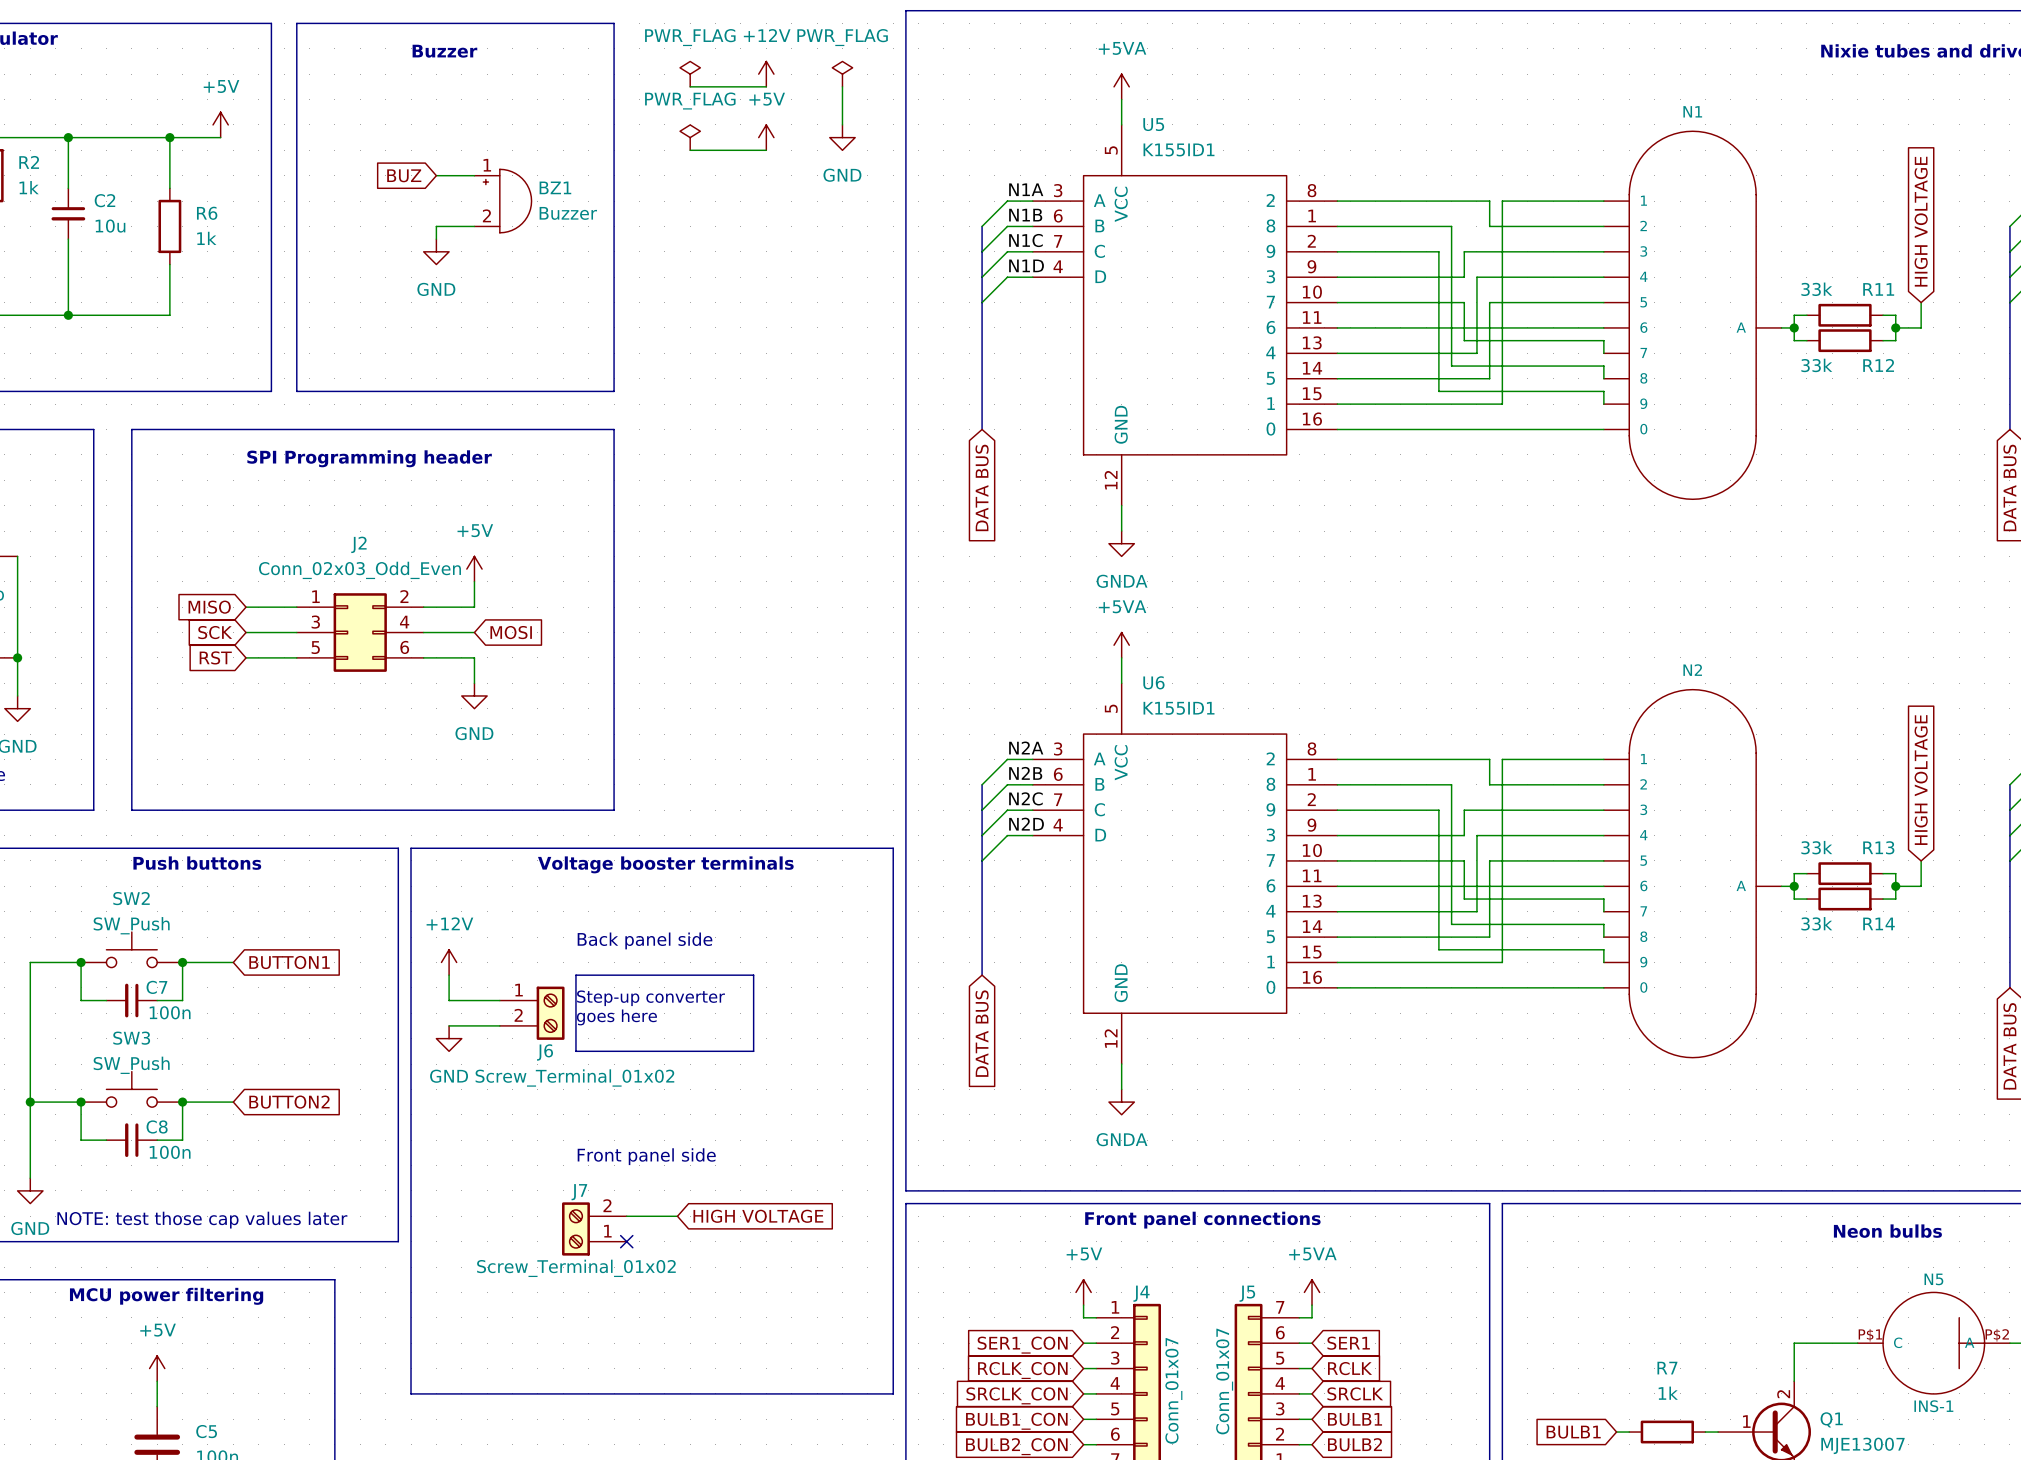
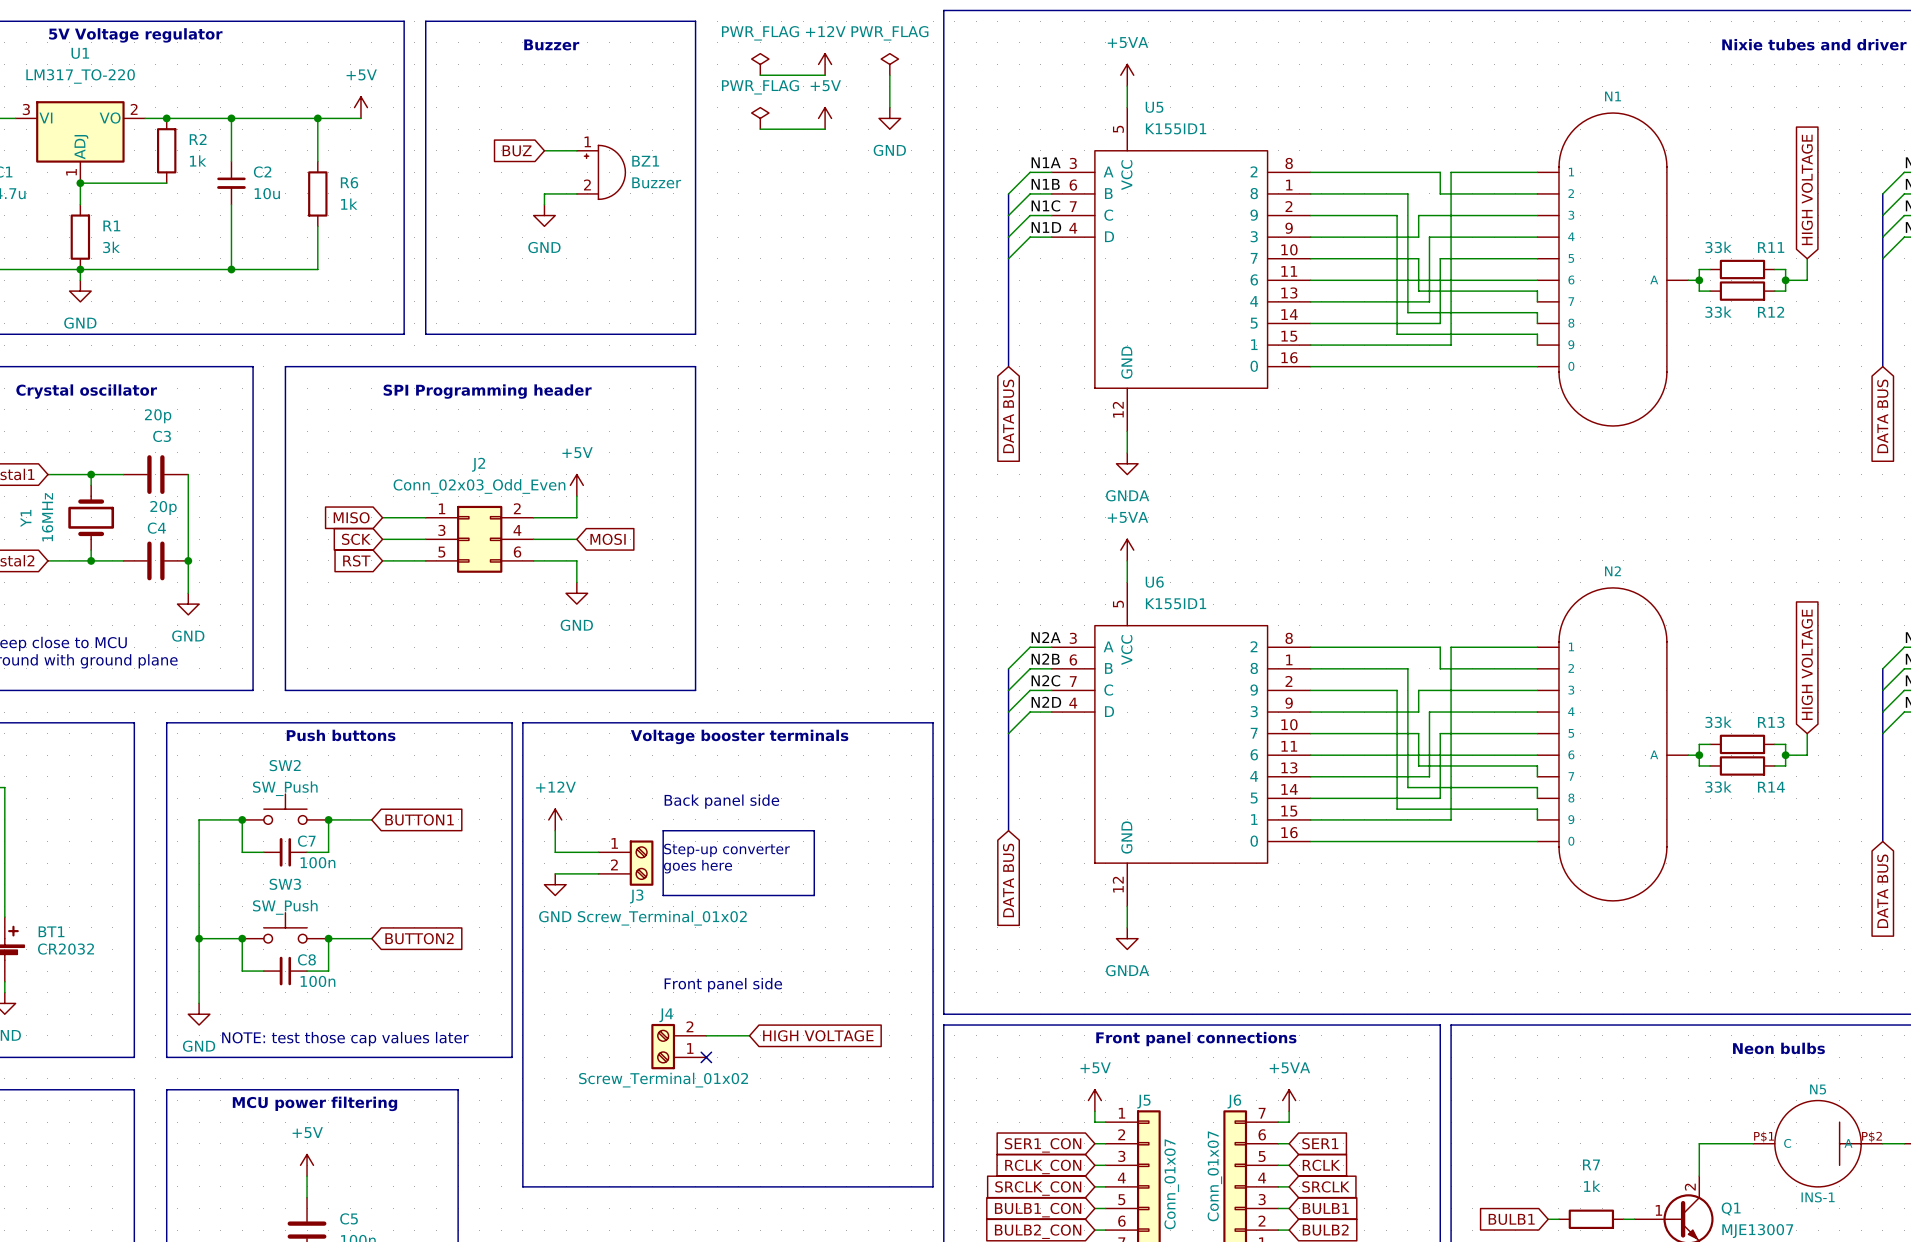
J6 name: J6 (545, 1052) -> J3 (636, 896)
J7 name: J7 (579, 1192) -> J4 (666, 1015)
J4 name: J4 (1141, 1293) -> J5 (1143, 1101)
J5 name: J5 (1247, 1293) -> J6 (1234, 1101)

